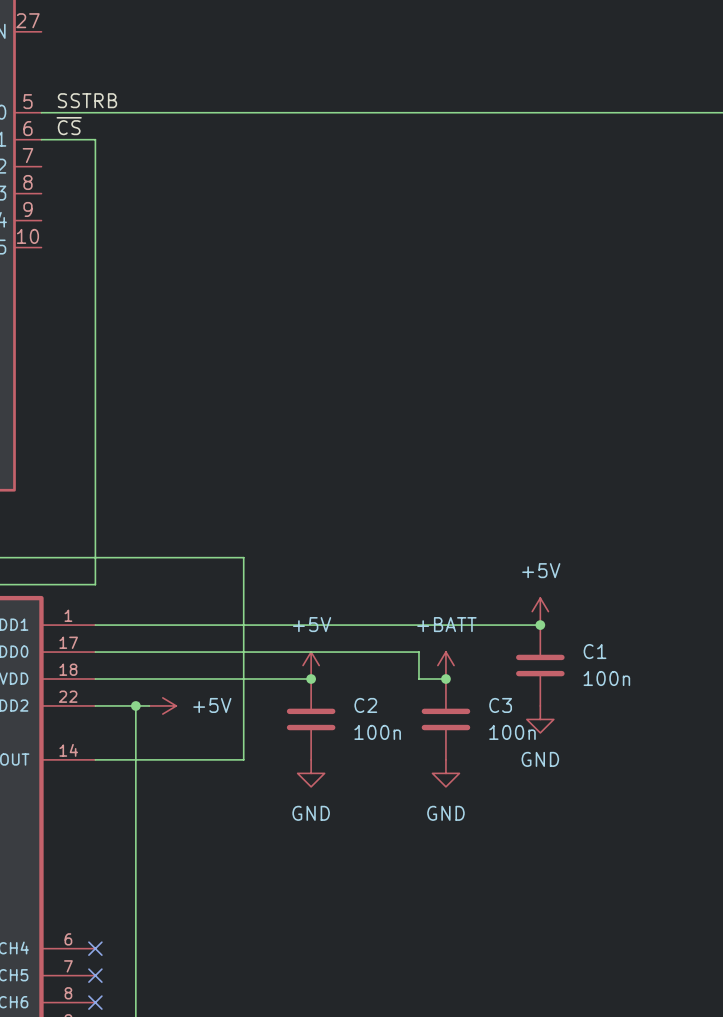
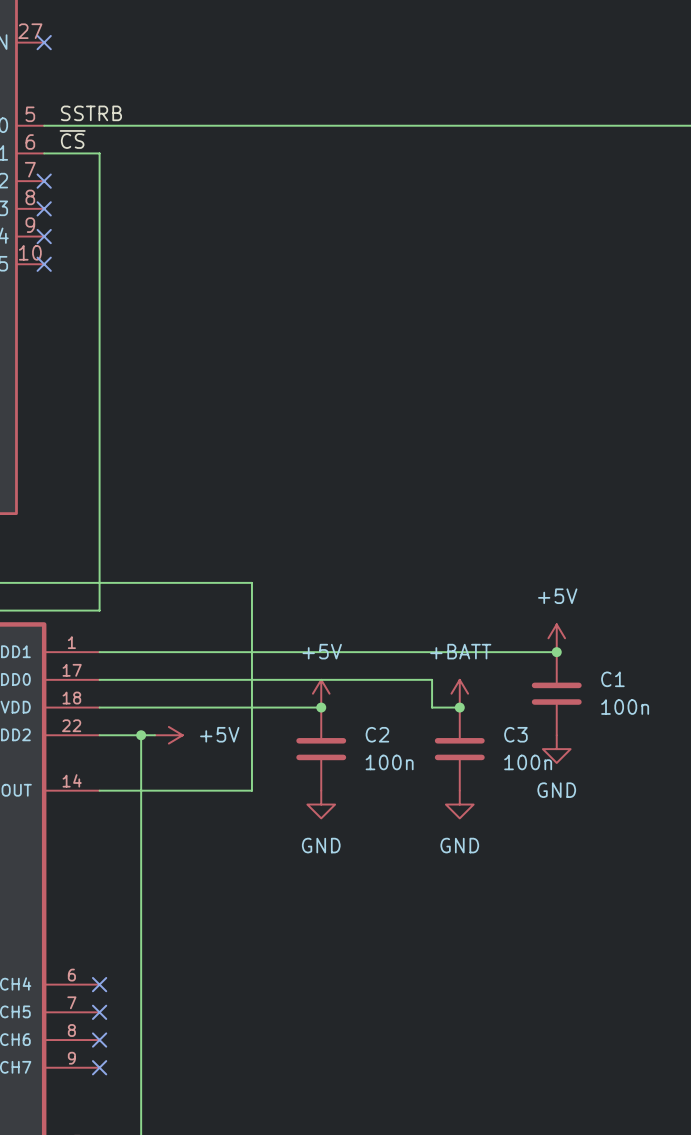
no-connect mark: none -> (44, 42)
no-connect mark: none -> (44, 181)
no-connect mark: none -> (44, 208)
no-connect mark: none -> (44, 236)
no-connect mark: none -> (44, 264)

